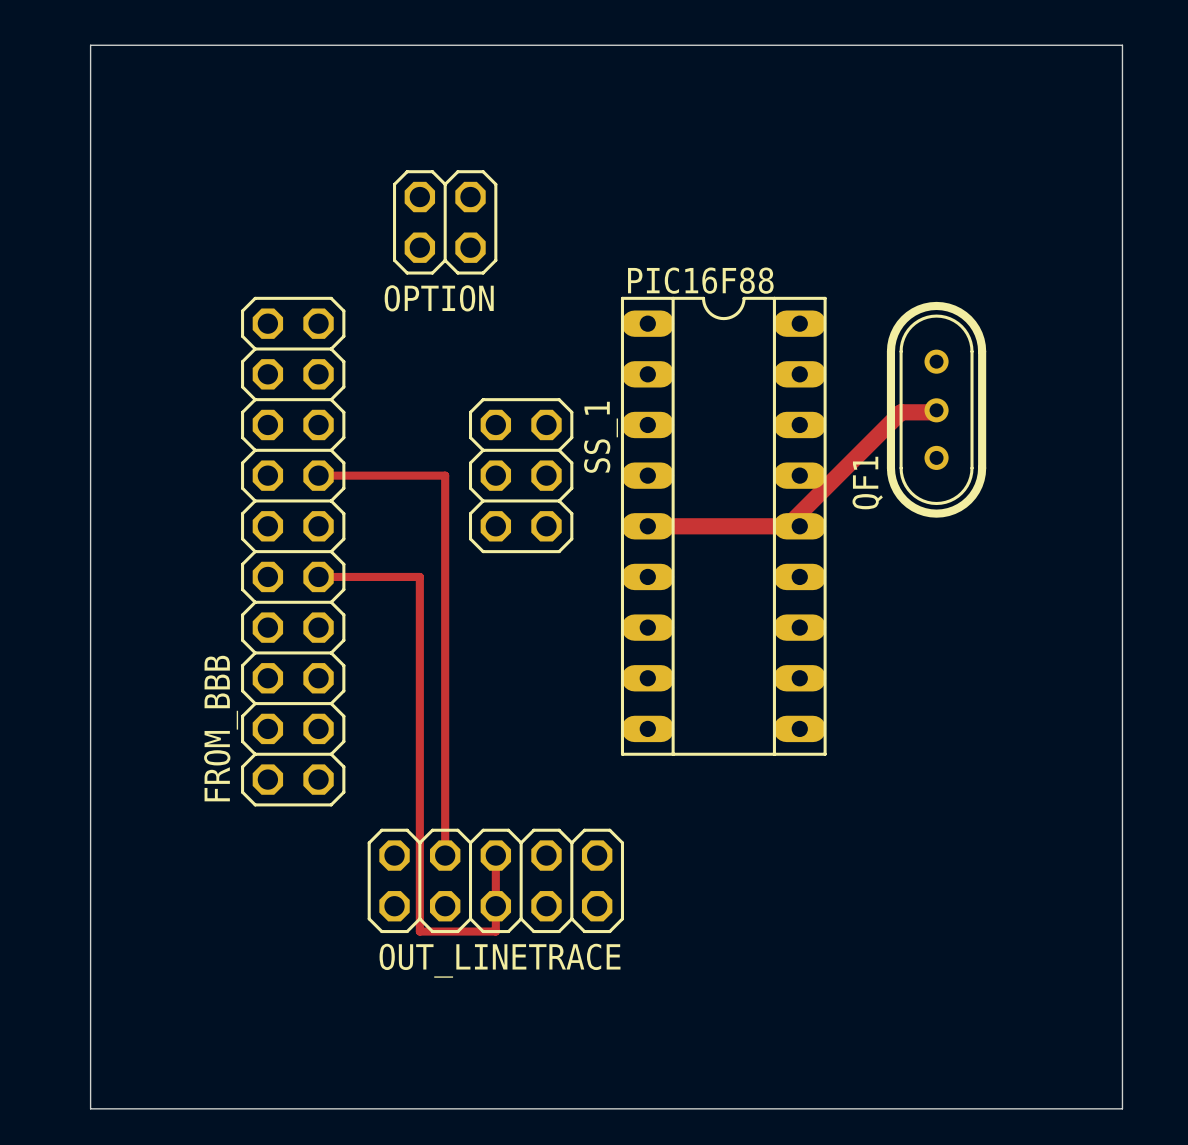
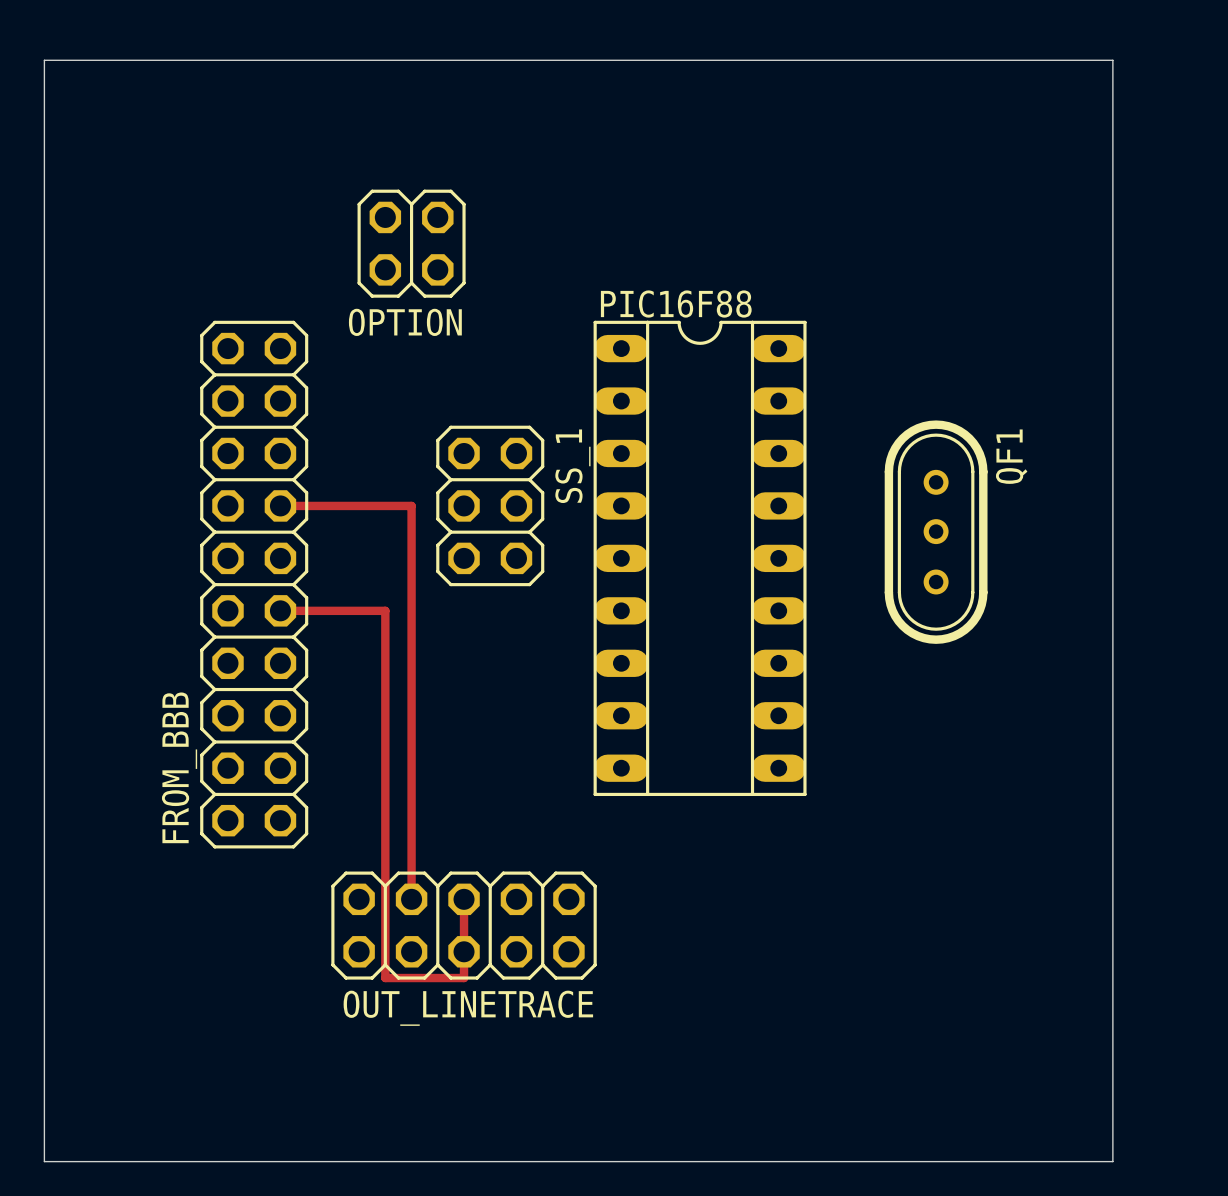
QF1 rotation: 0° (936, 409) -> 180° (936, 532)
track: (936, 410) (934, 412) (901, 412) (787, 526) (647, 526) -> none

